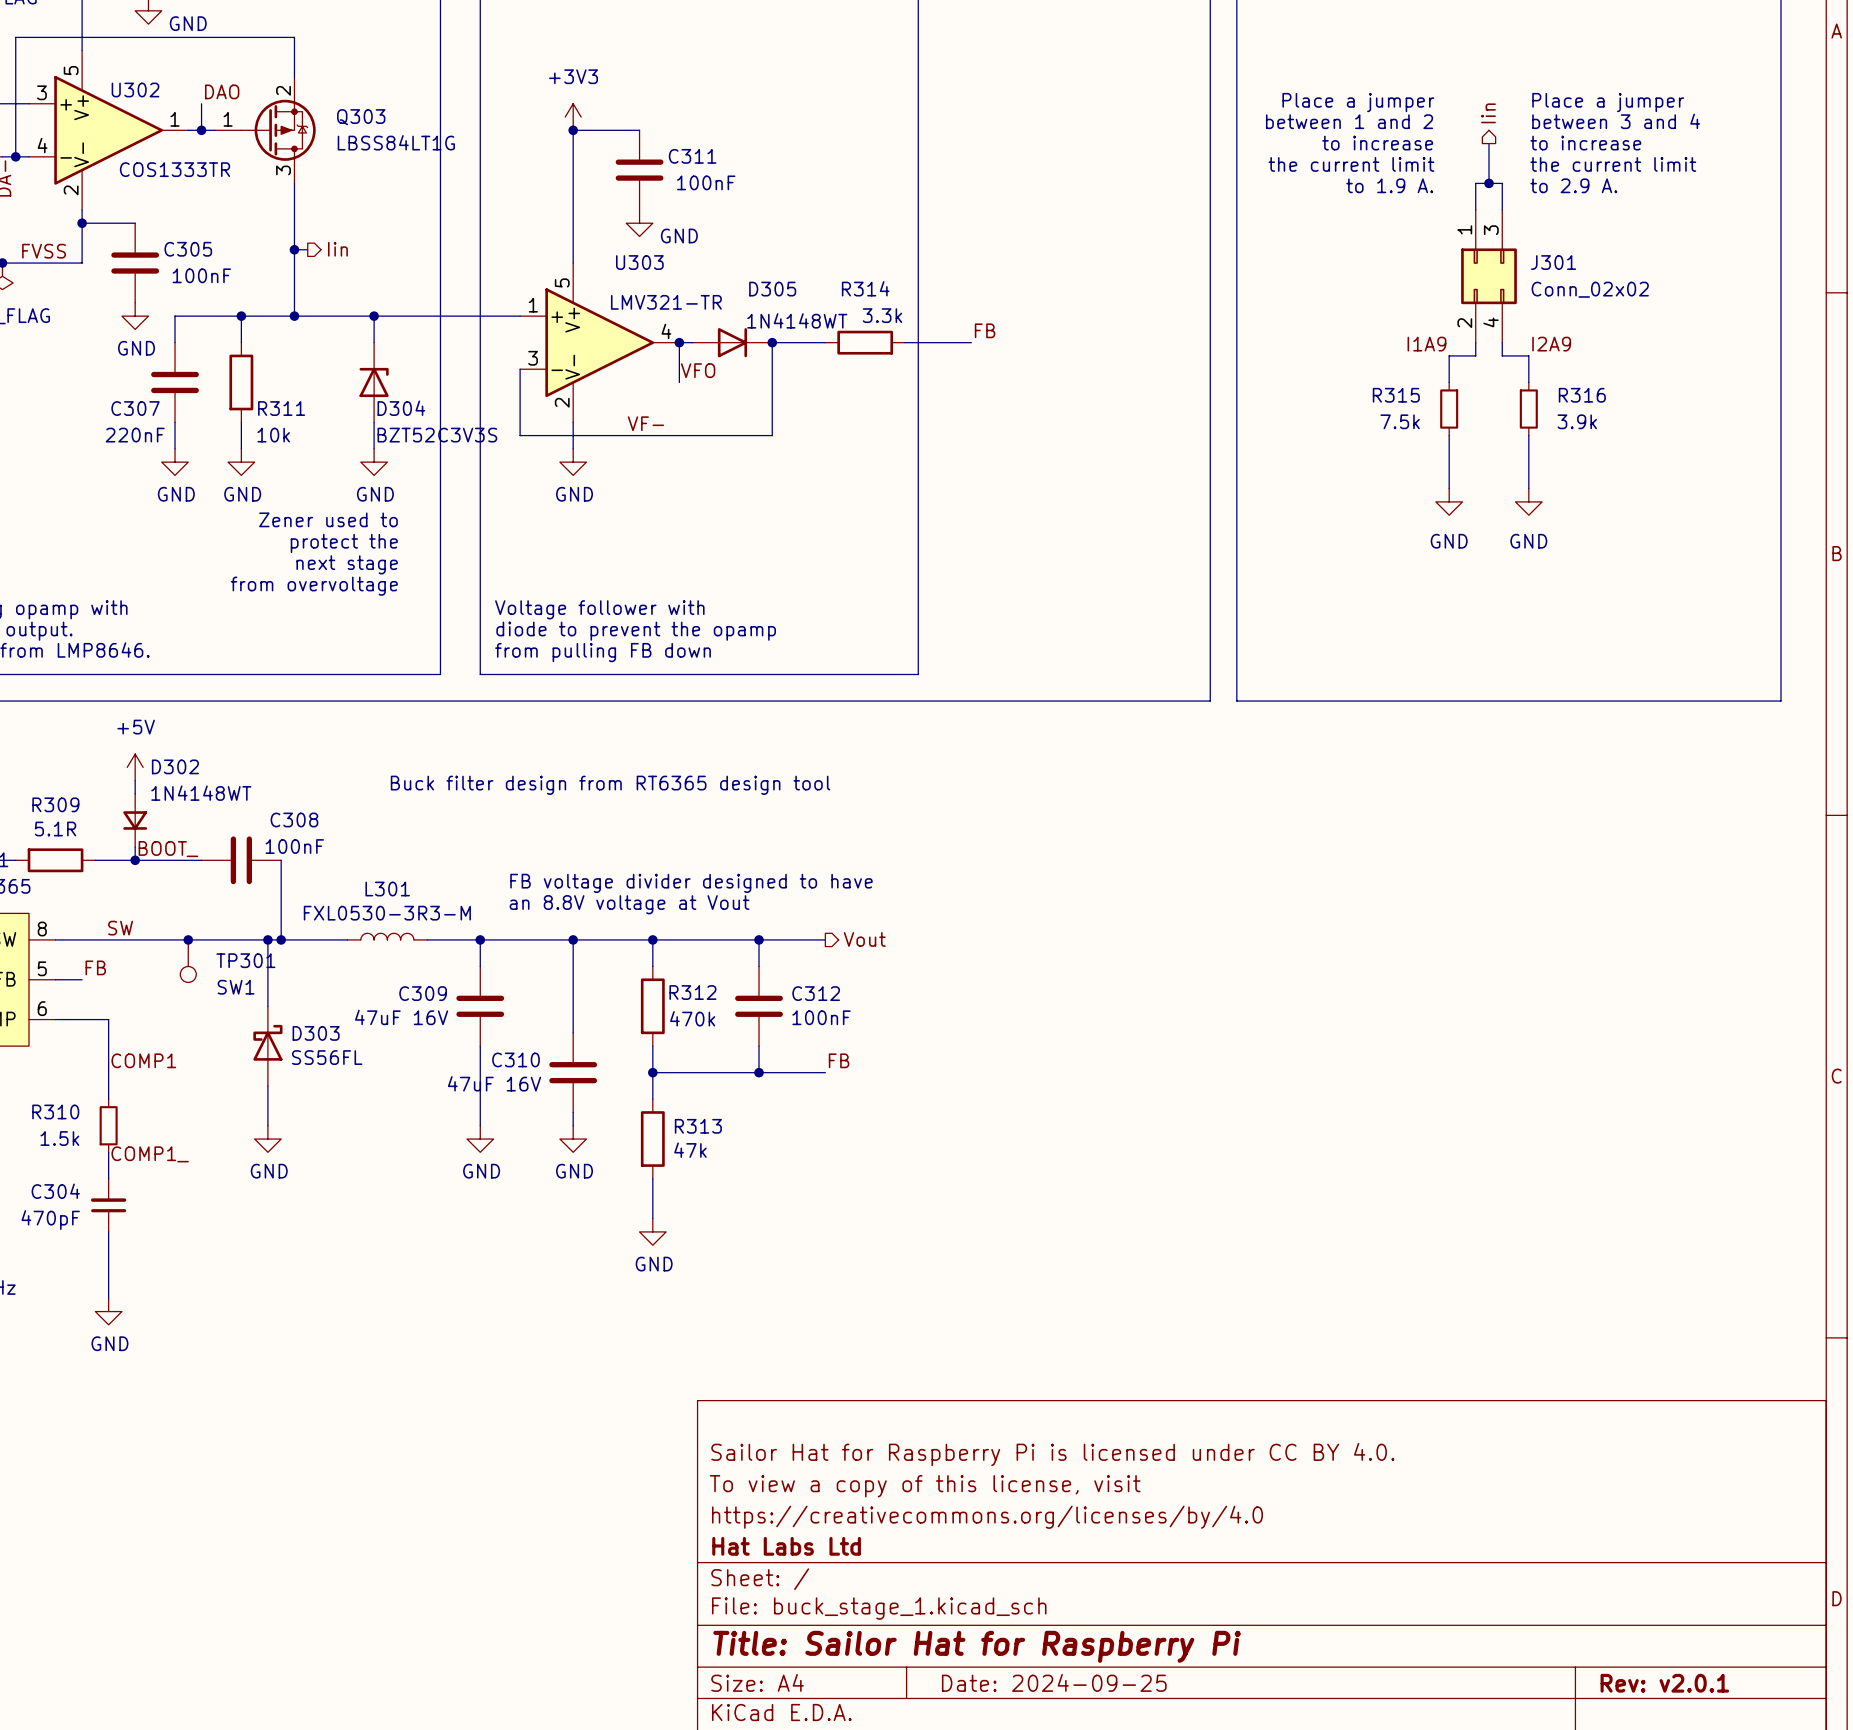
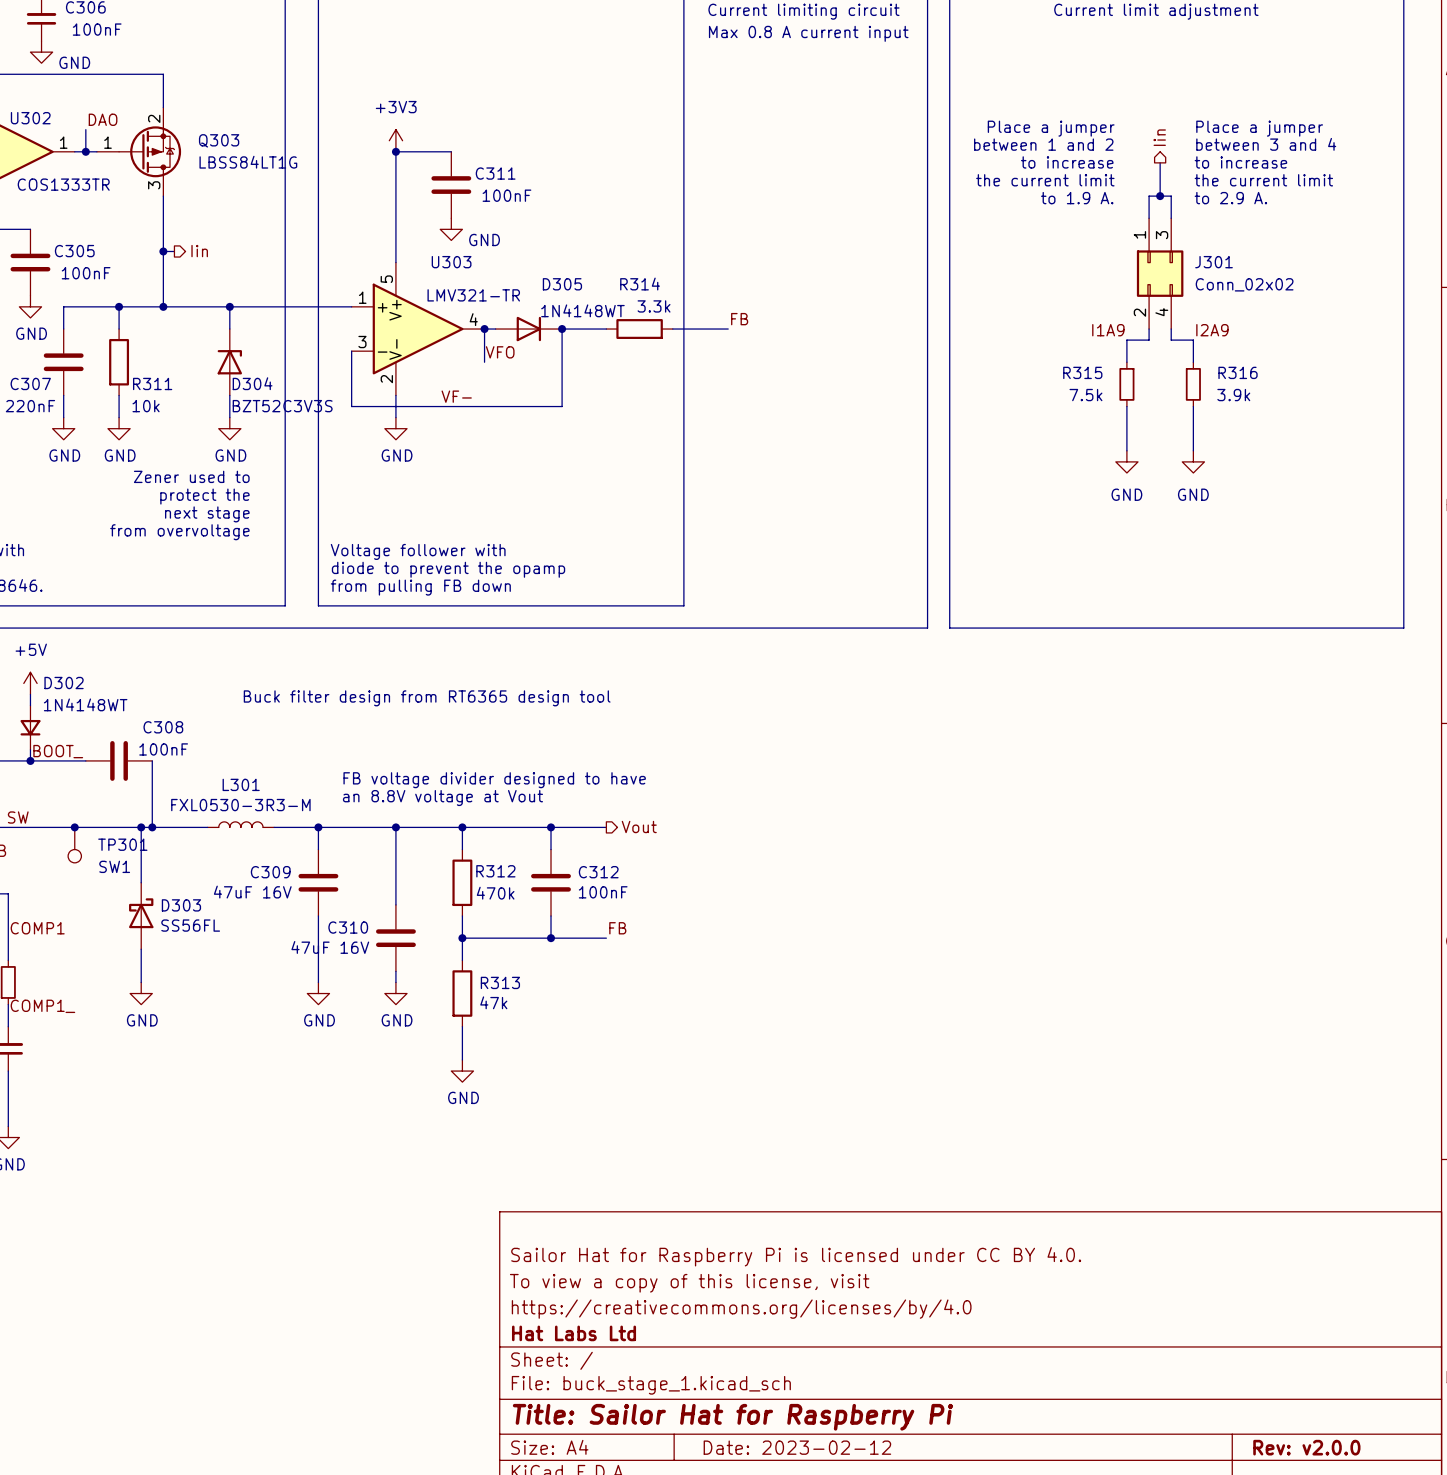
title block: Date: 2024-09-25 (1054, 1682) -> Date: 2023-02-12 (797, 1447)
title block: Rev: v2.0.1 (1664, 1683) -> Rev: v2.0.0 (1306, 1447)

